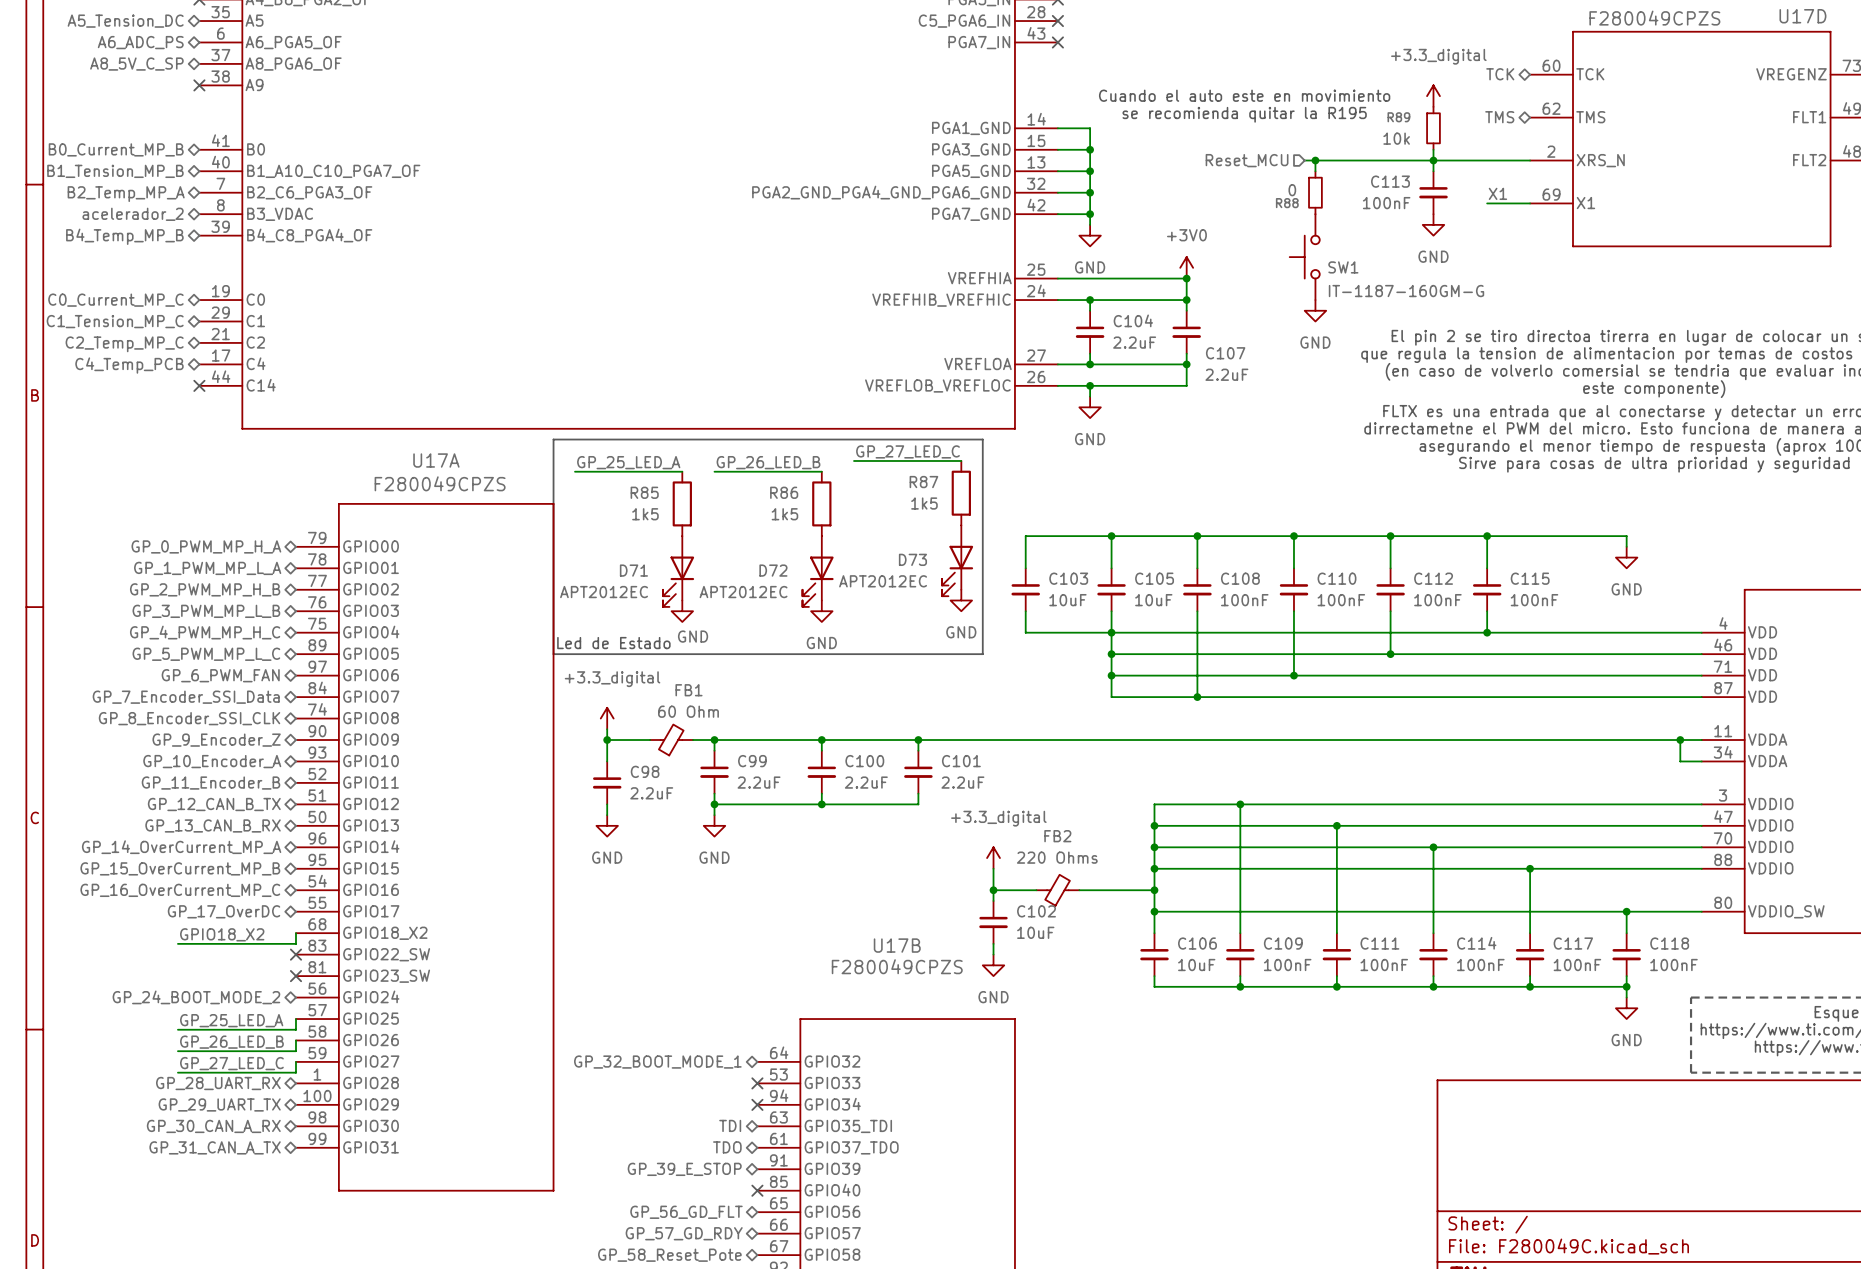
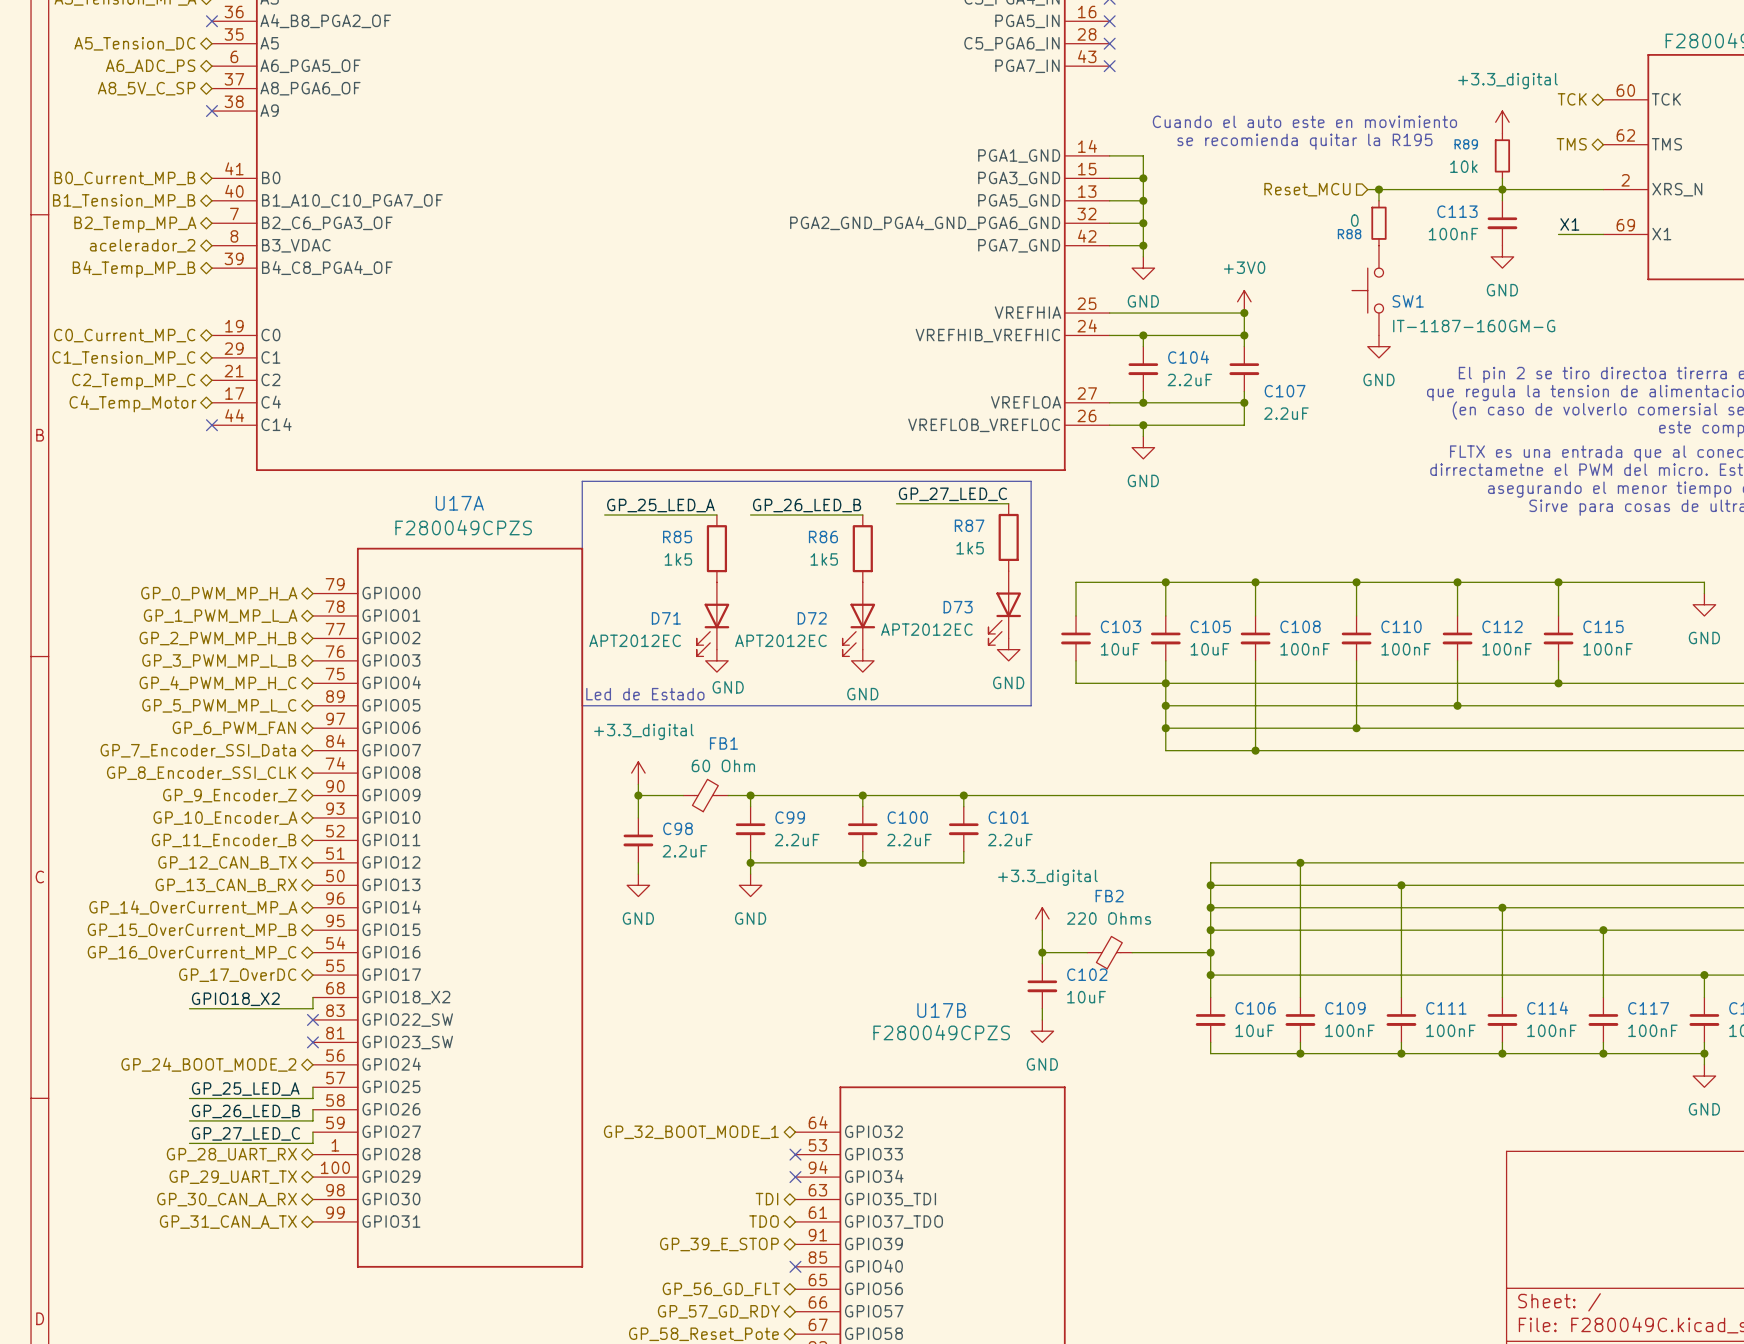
hierarchical label: C4_Temp_PCB (129, 365) -> C4_Temp_Motor (132, 403)

